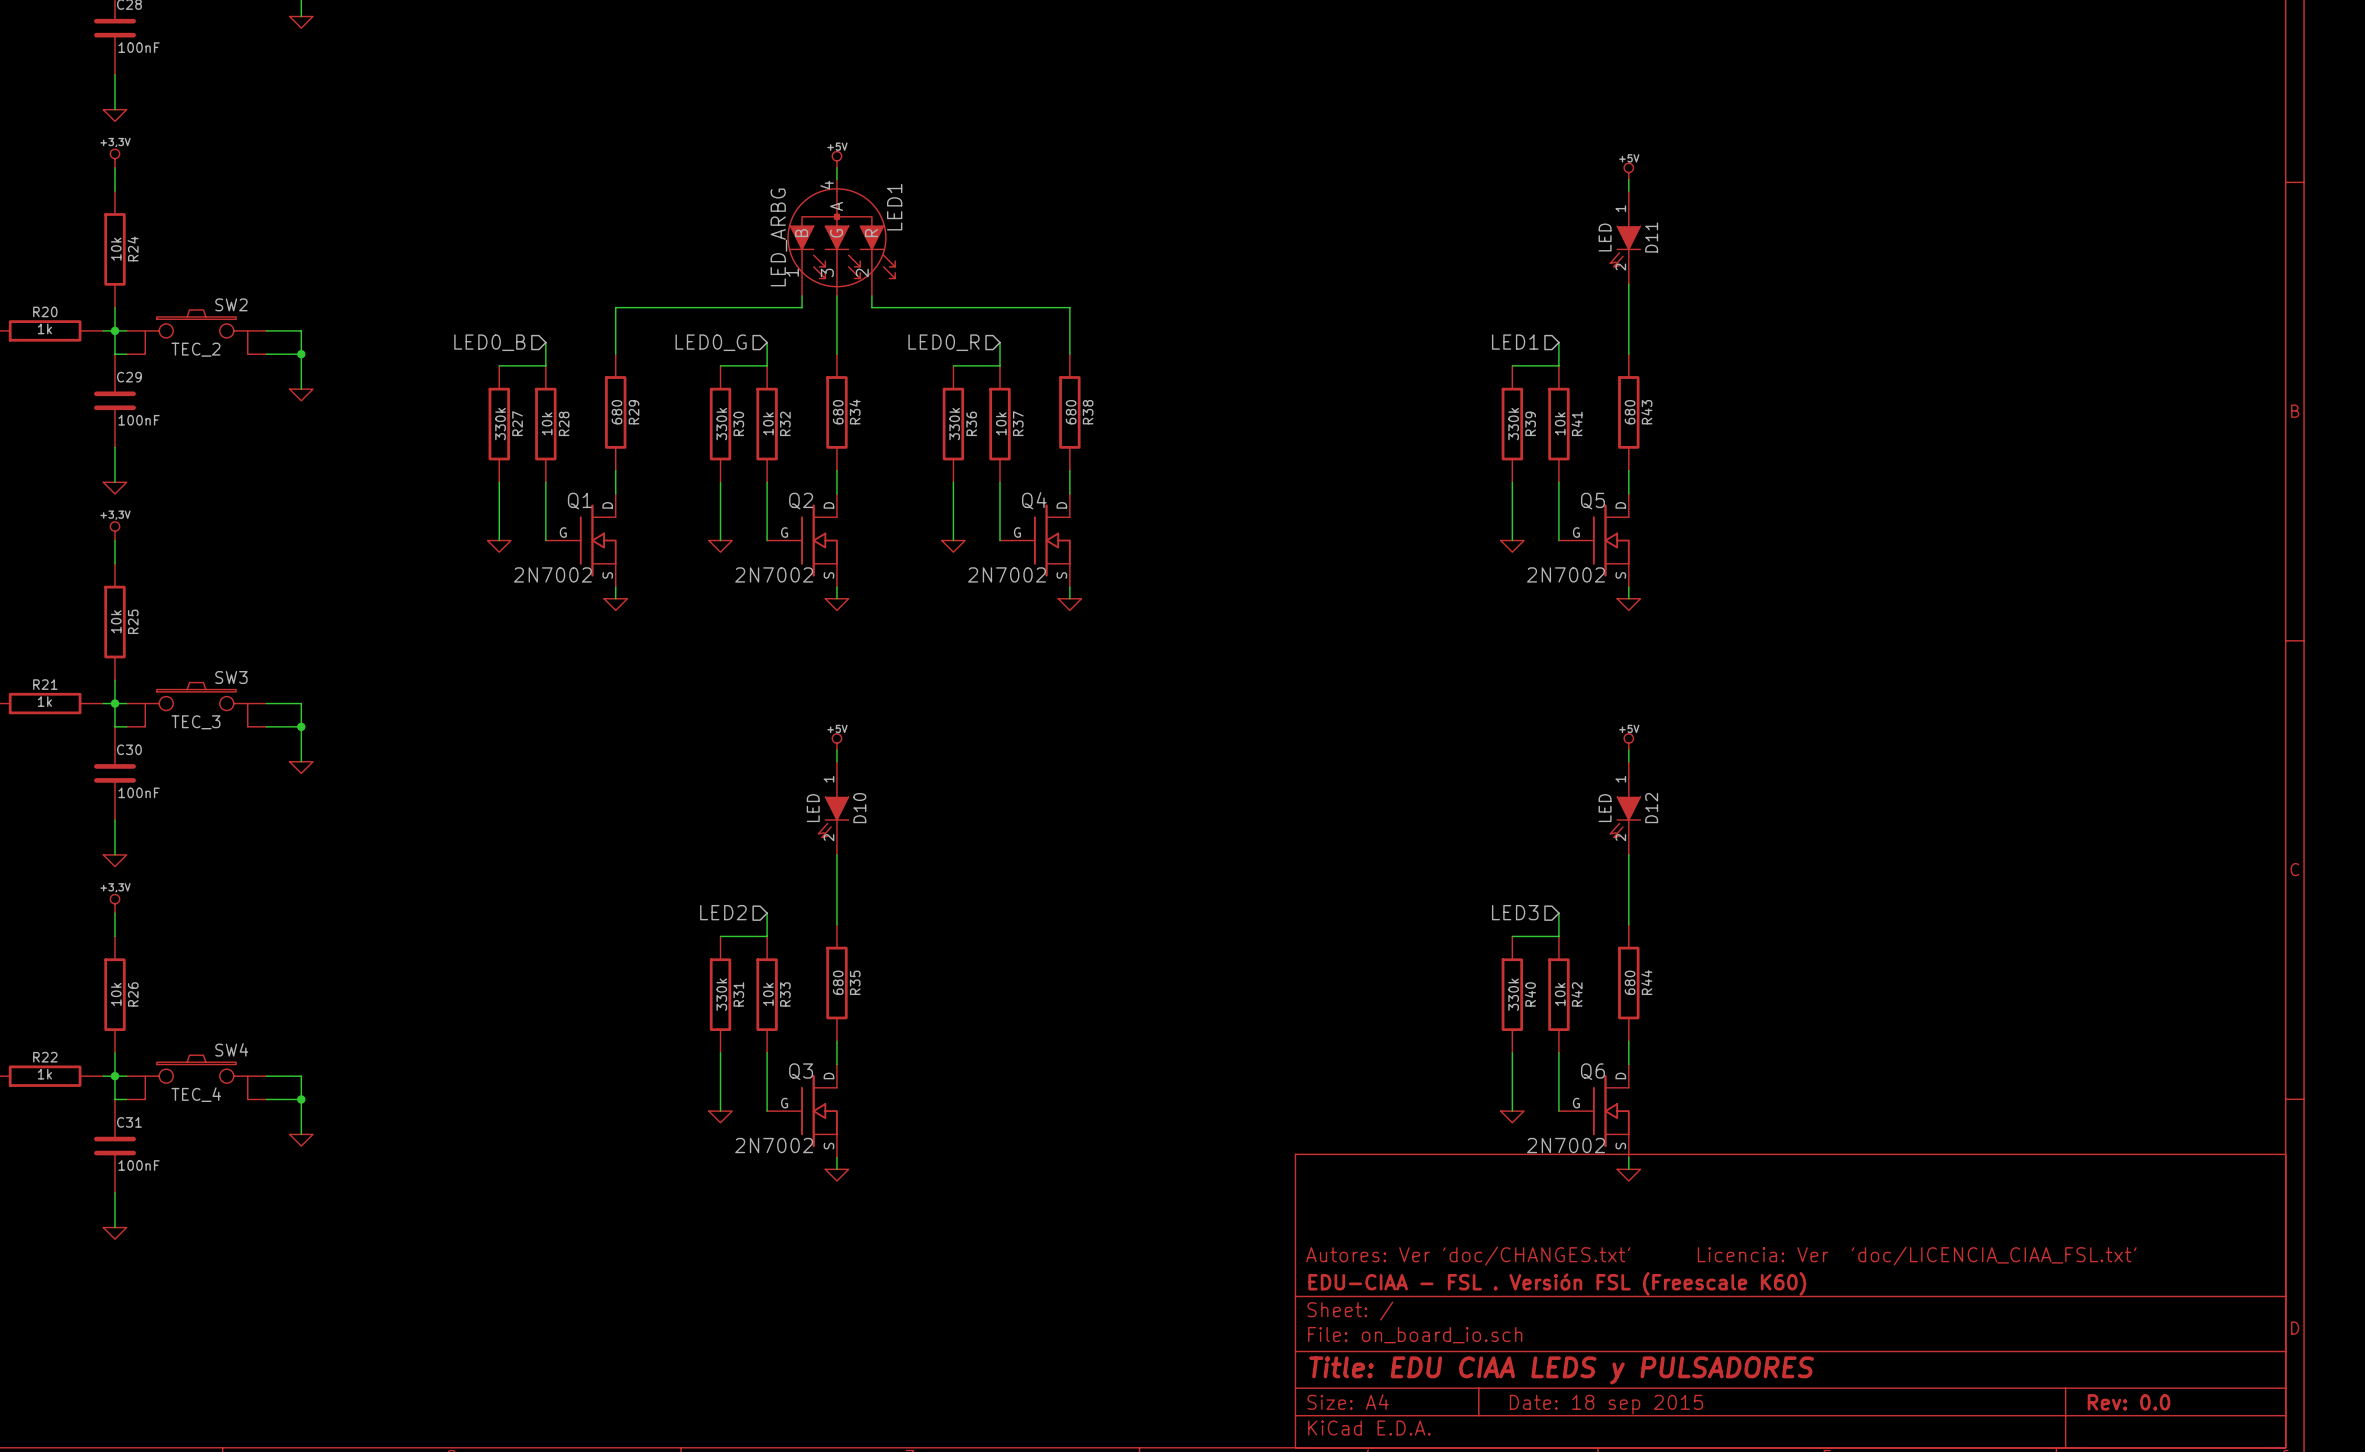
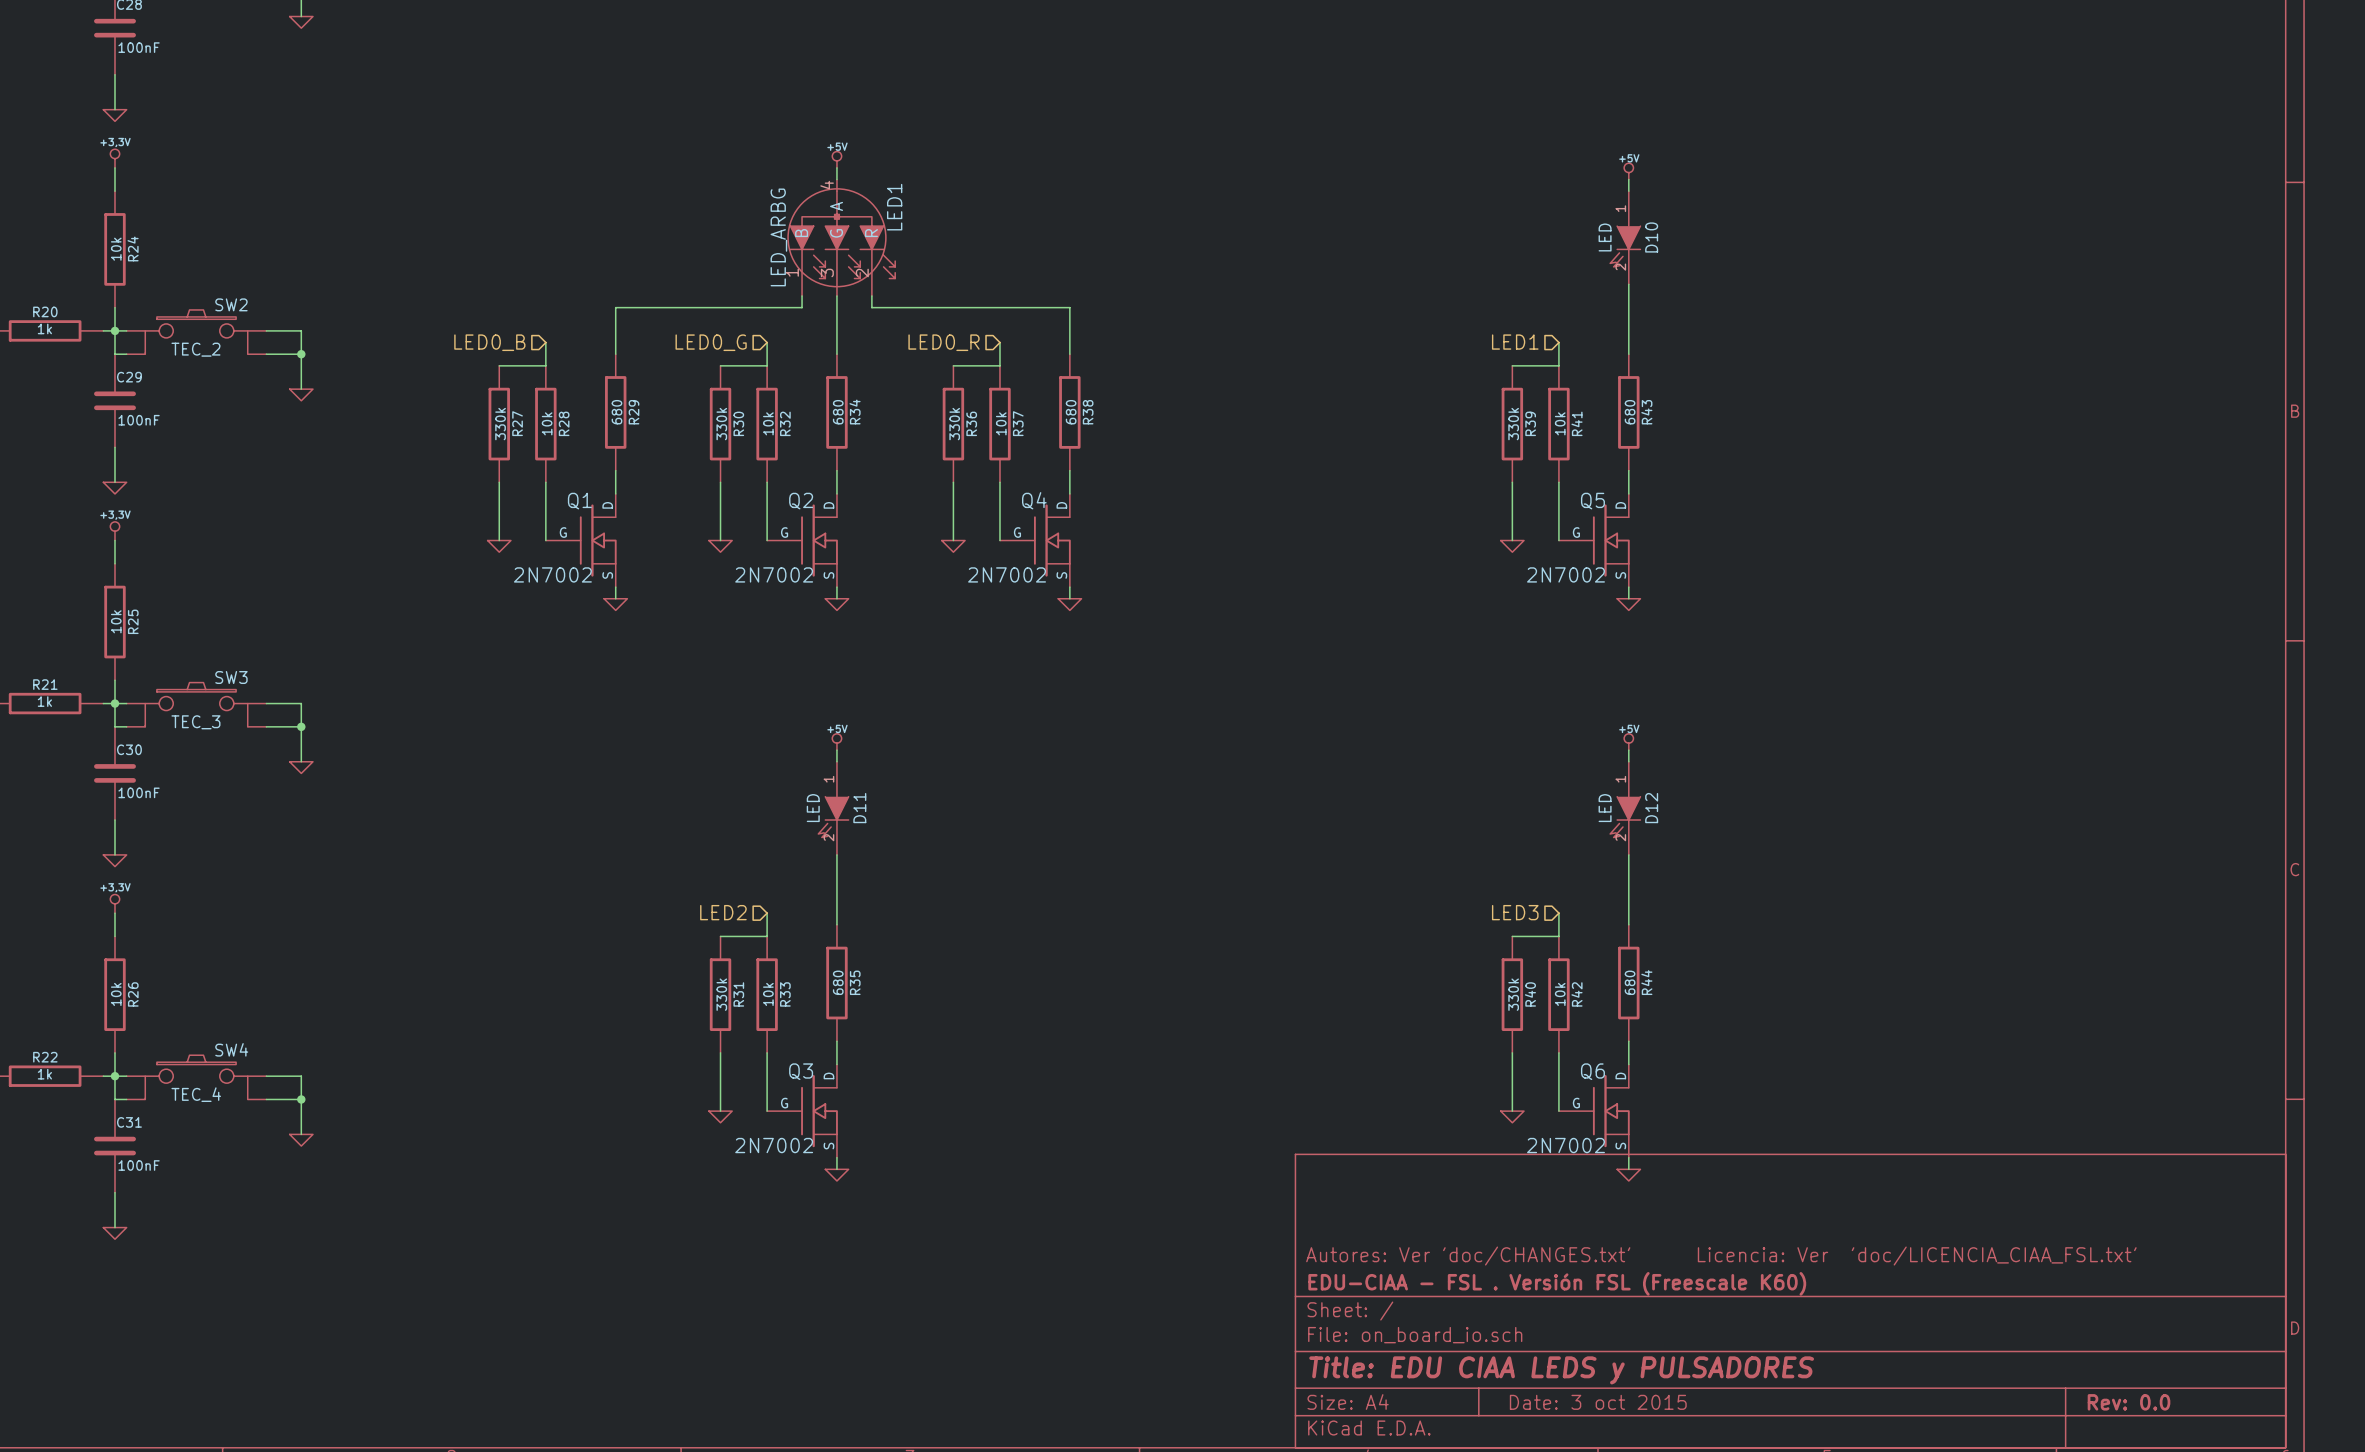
D11 name: D11 (1651, 237) -> D10 (1651, 237)
D10 name: D10 (859, 808) -> D11 (859, 808)
title block: Date: 18 sep 2015 (1606, 1404) -> Date: 3 oct 2015 (1598, 1402)

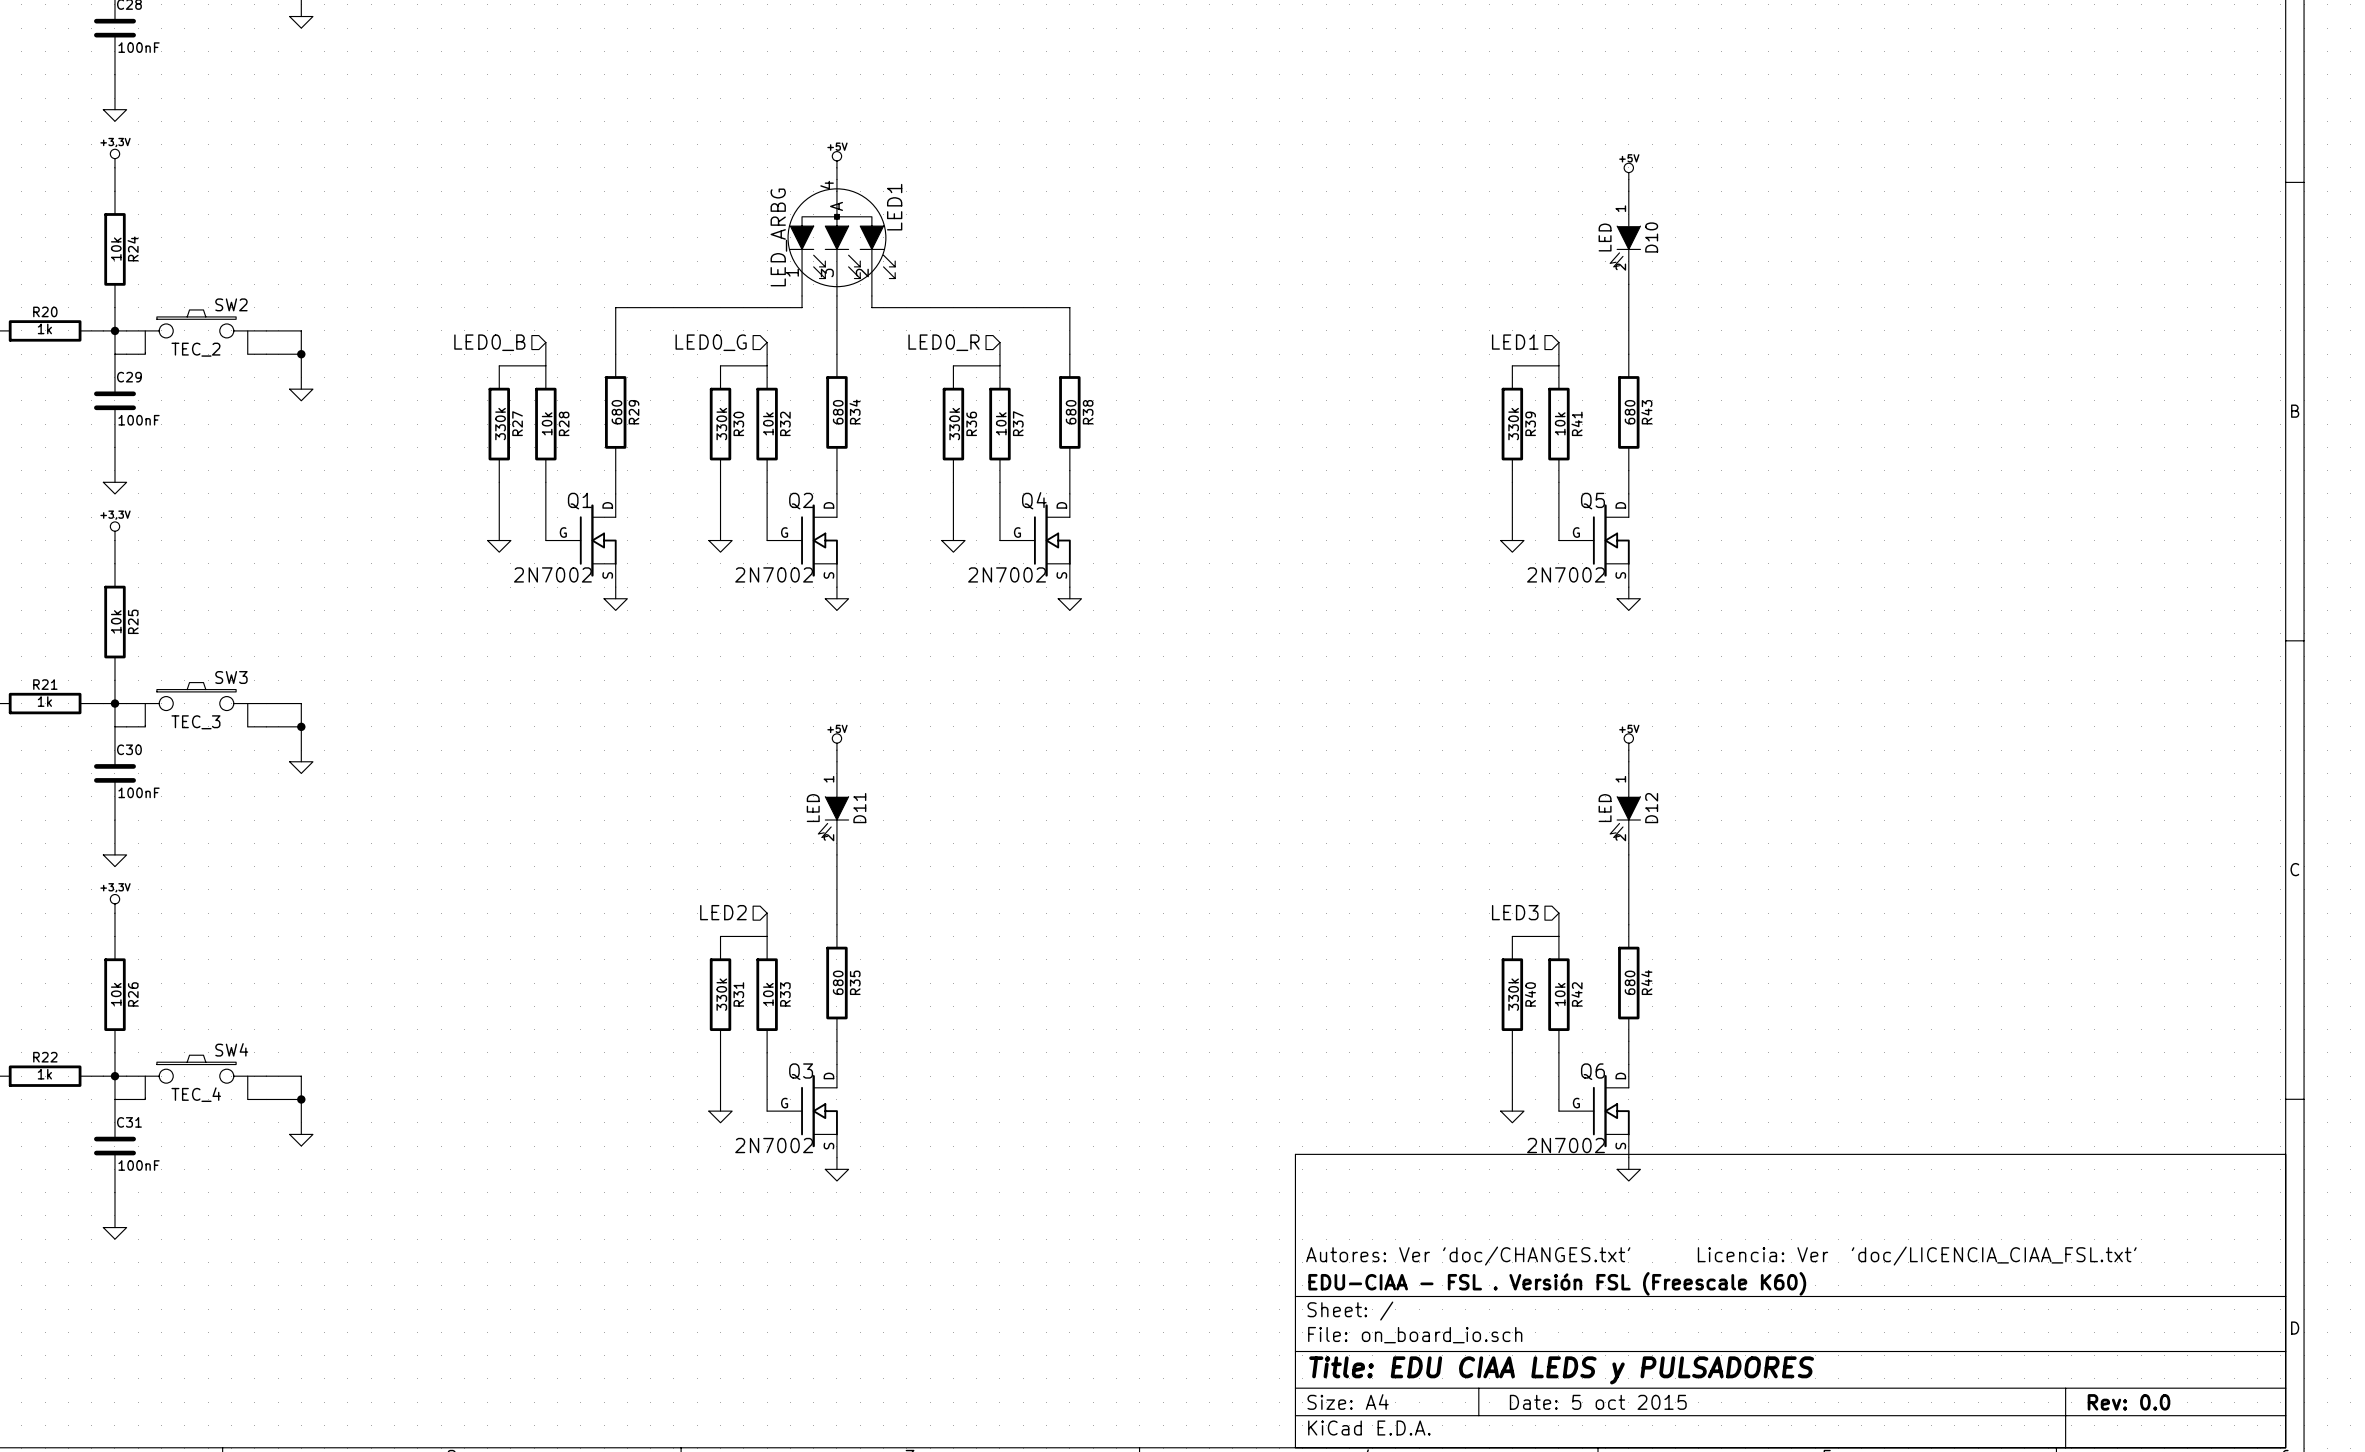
title block: Date: 3 oct 2015 (1598, 1402) -> Date: 5 oct 2015 (1598, 1402)

